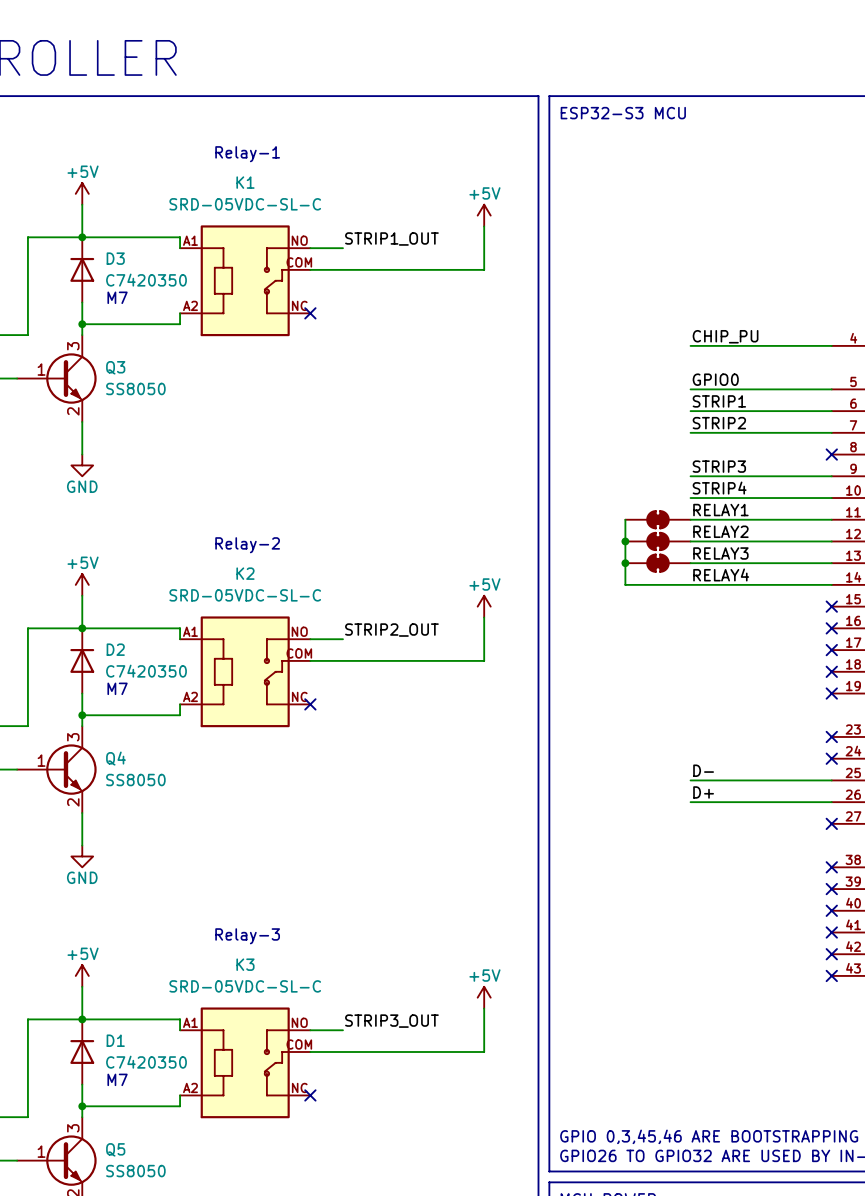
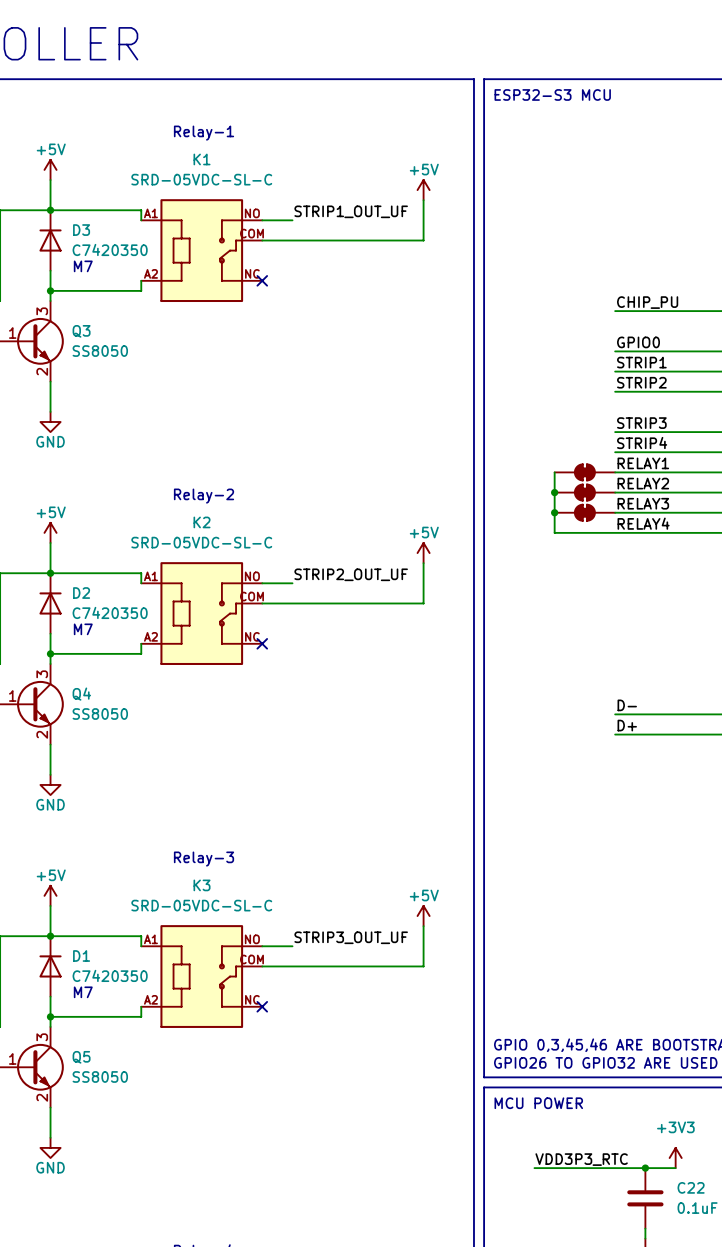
label: STRIP1_OUT (391, 239) -> STRIP1_OUT_UF (351, 211)
label: STRIP2_OUT (391, 630) -> STRIP2_OUT_UF (351, 574)
label: STRIP3_OUT (391, 1021) -> STRIP3_OUT_UF (351, 937)

